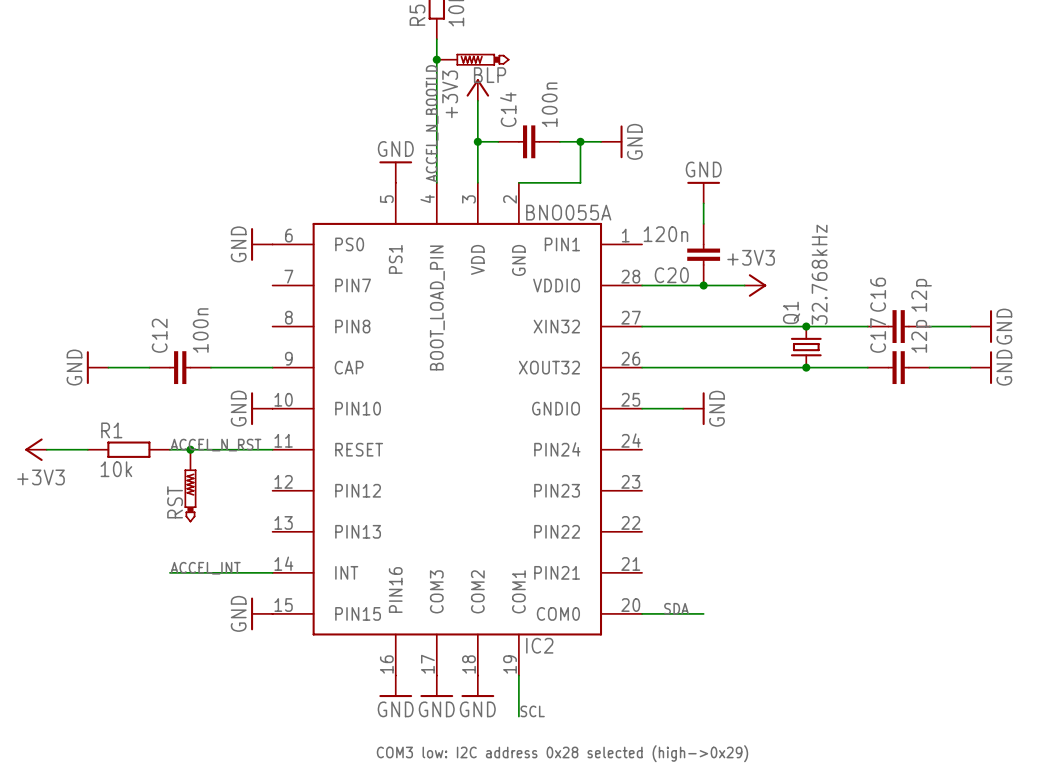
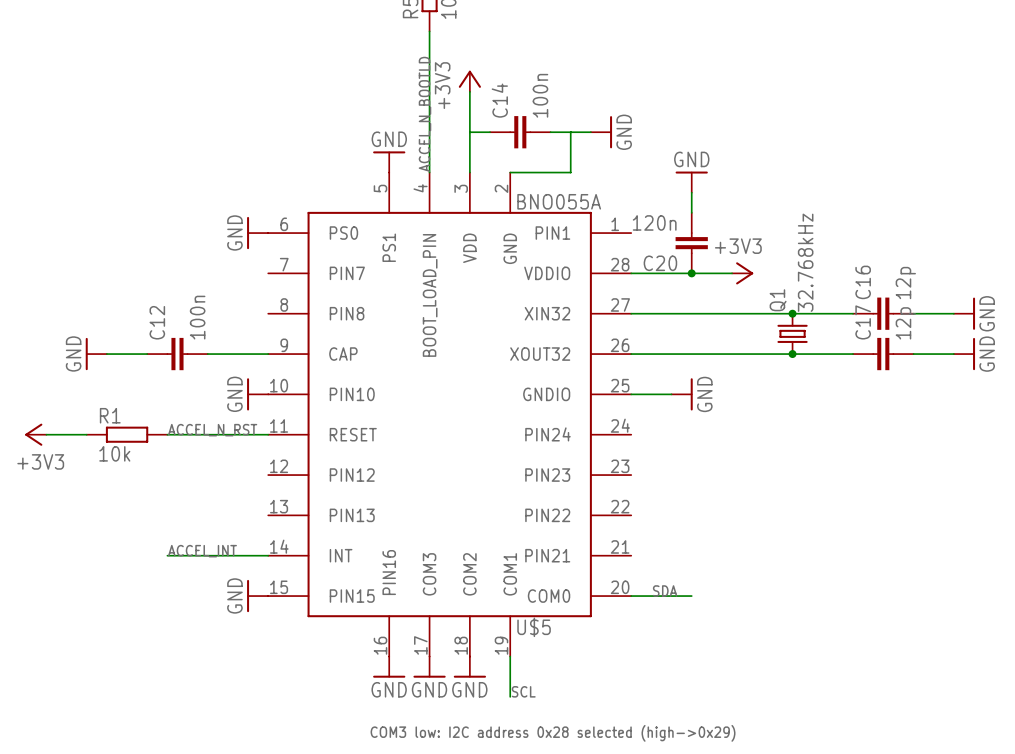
junction: (436, 59) -> none
BLP: (473, 59) -> none
junction: (477, 141) -> none
junction: (580, 141) -> none
junction: (190, 449) -> none
RST: (190, 485) -> none
IC2 name: IC2 (539, 645) -> U$5 (534, 627)

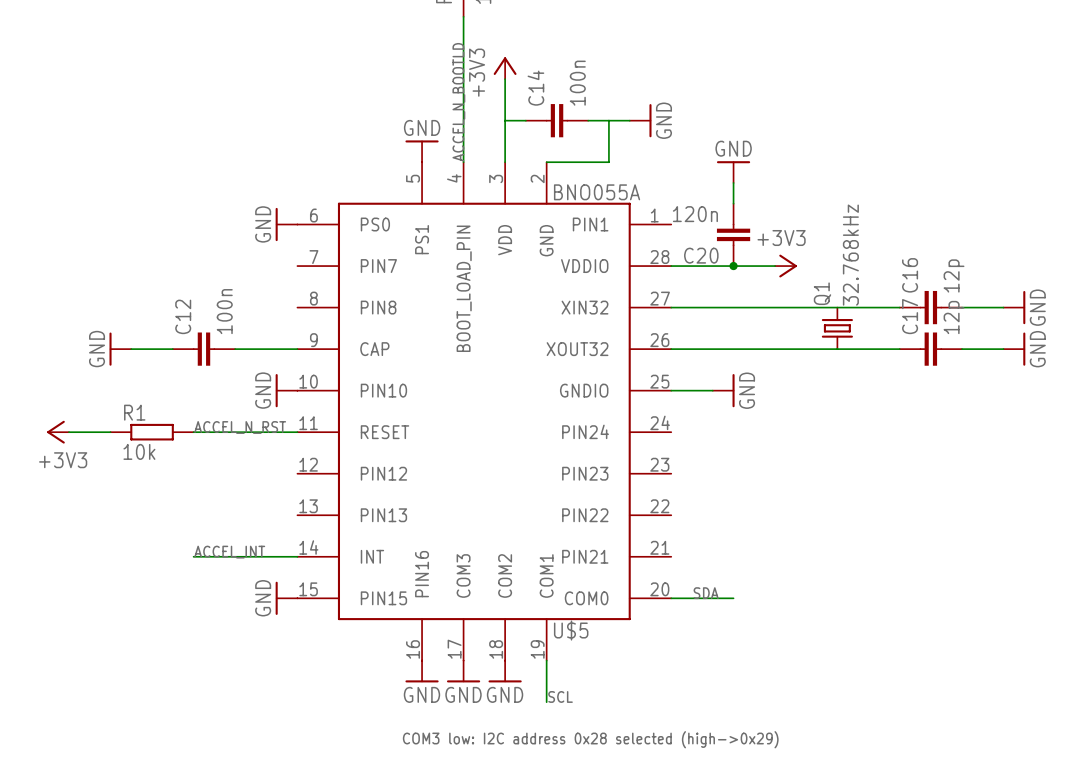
junction: (792, 313) -> none
junction: (792, 354) -> none

